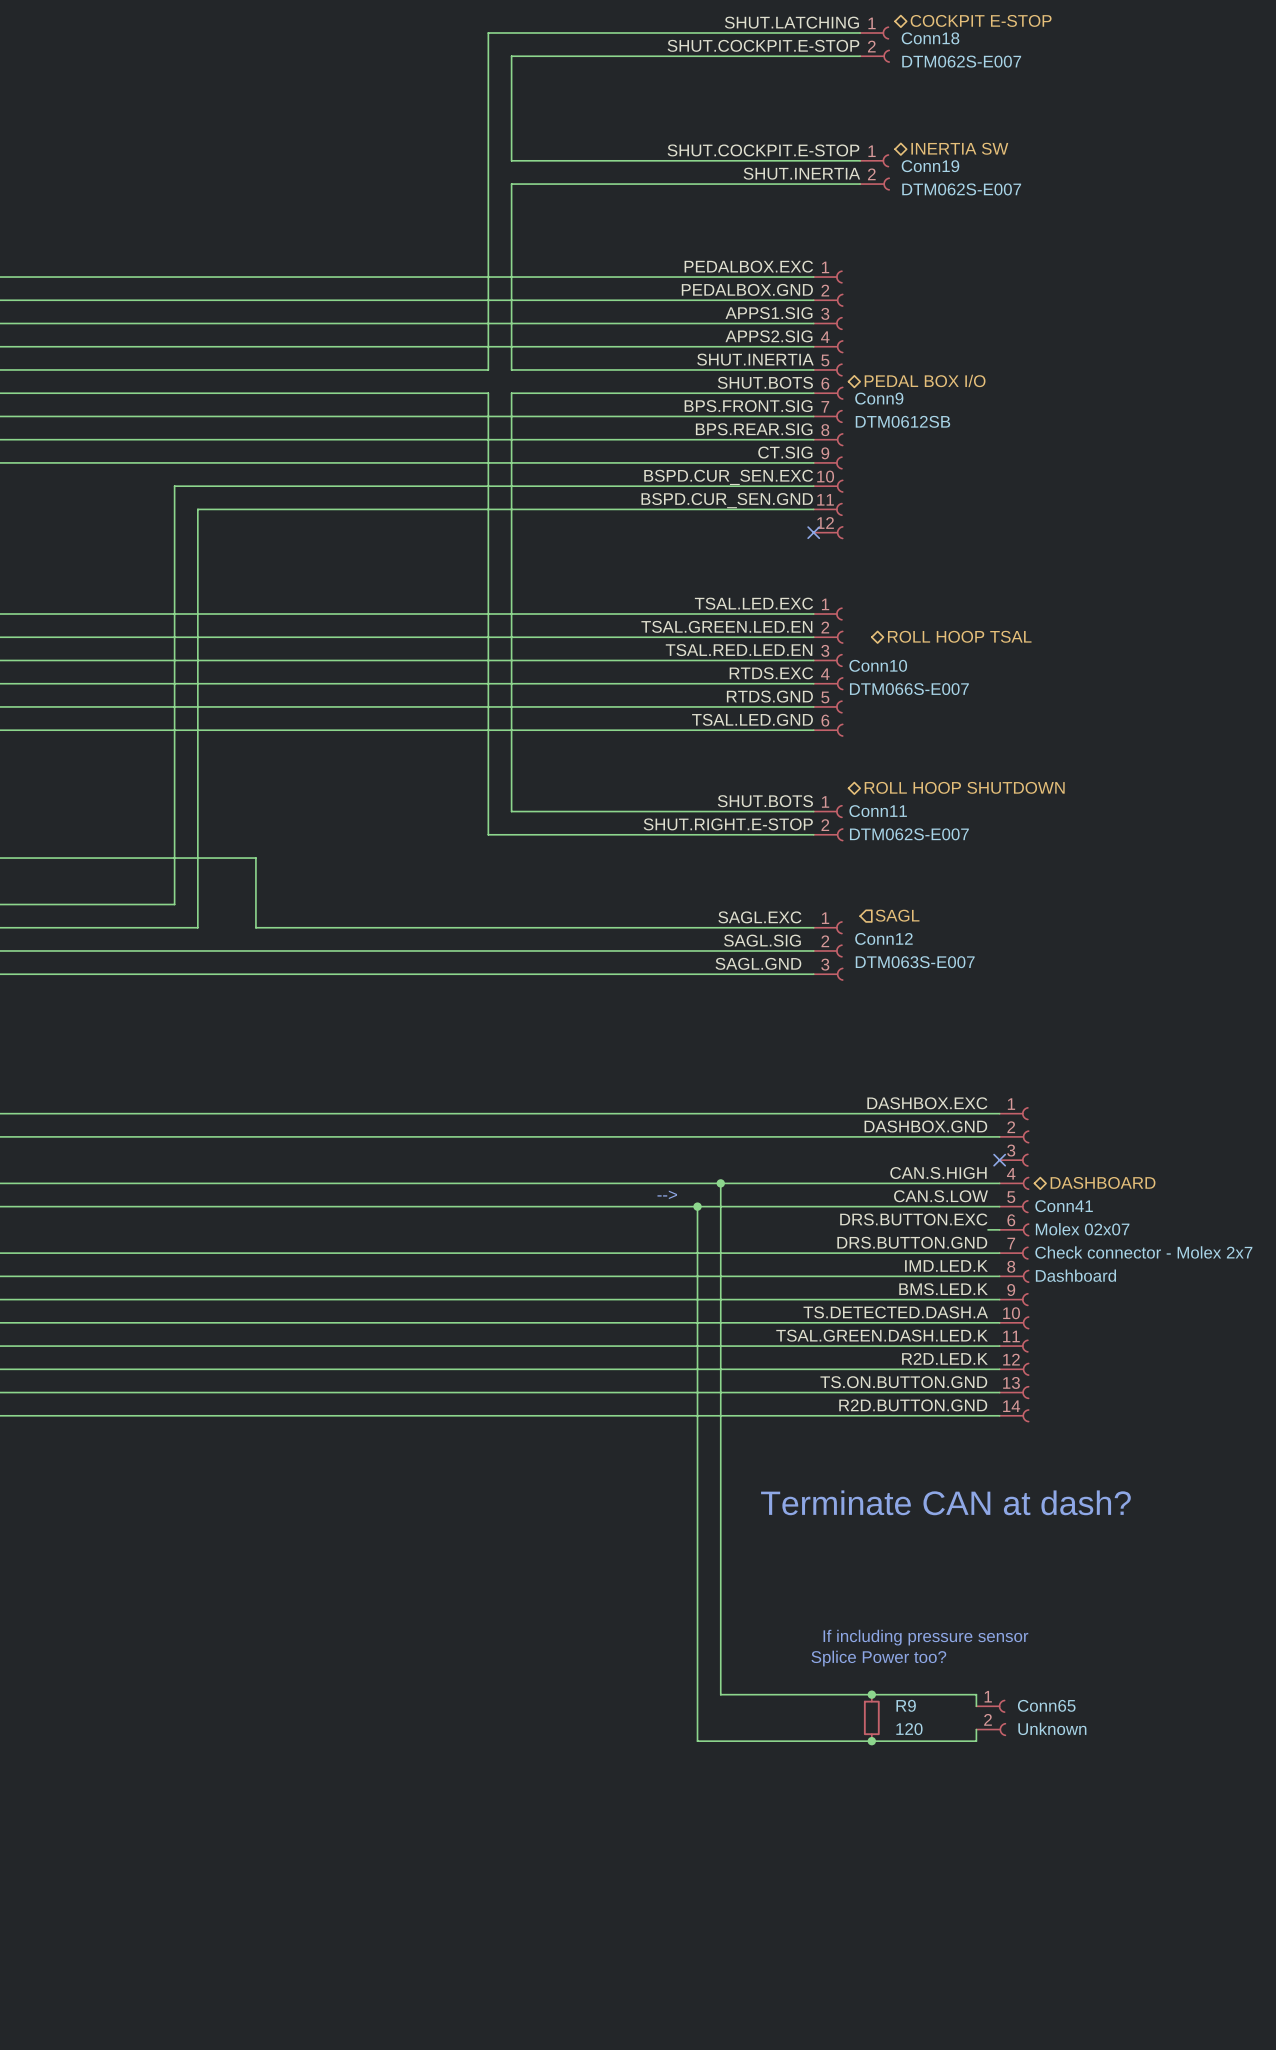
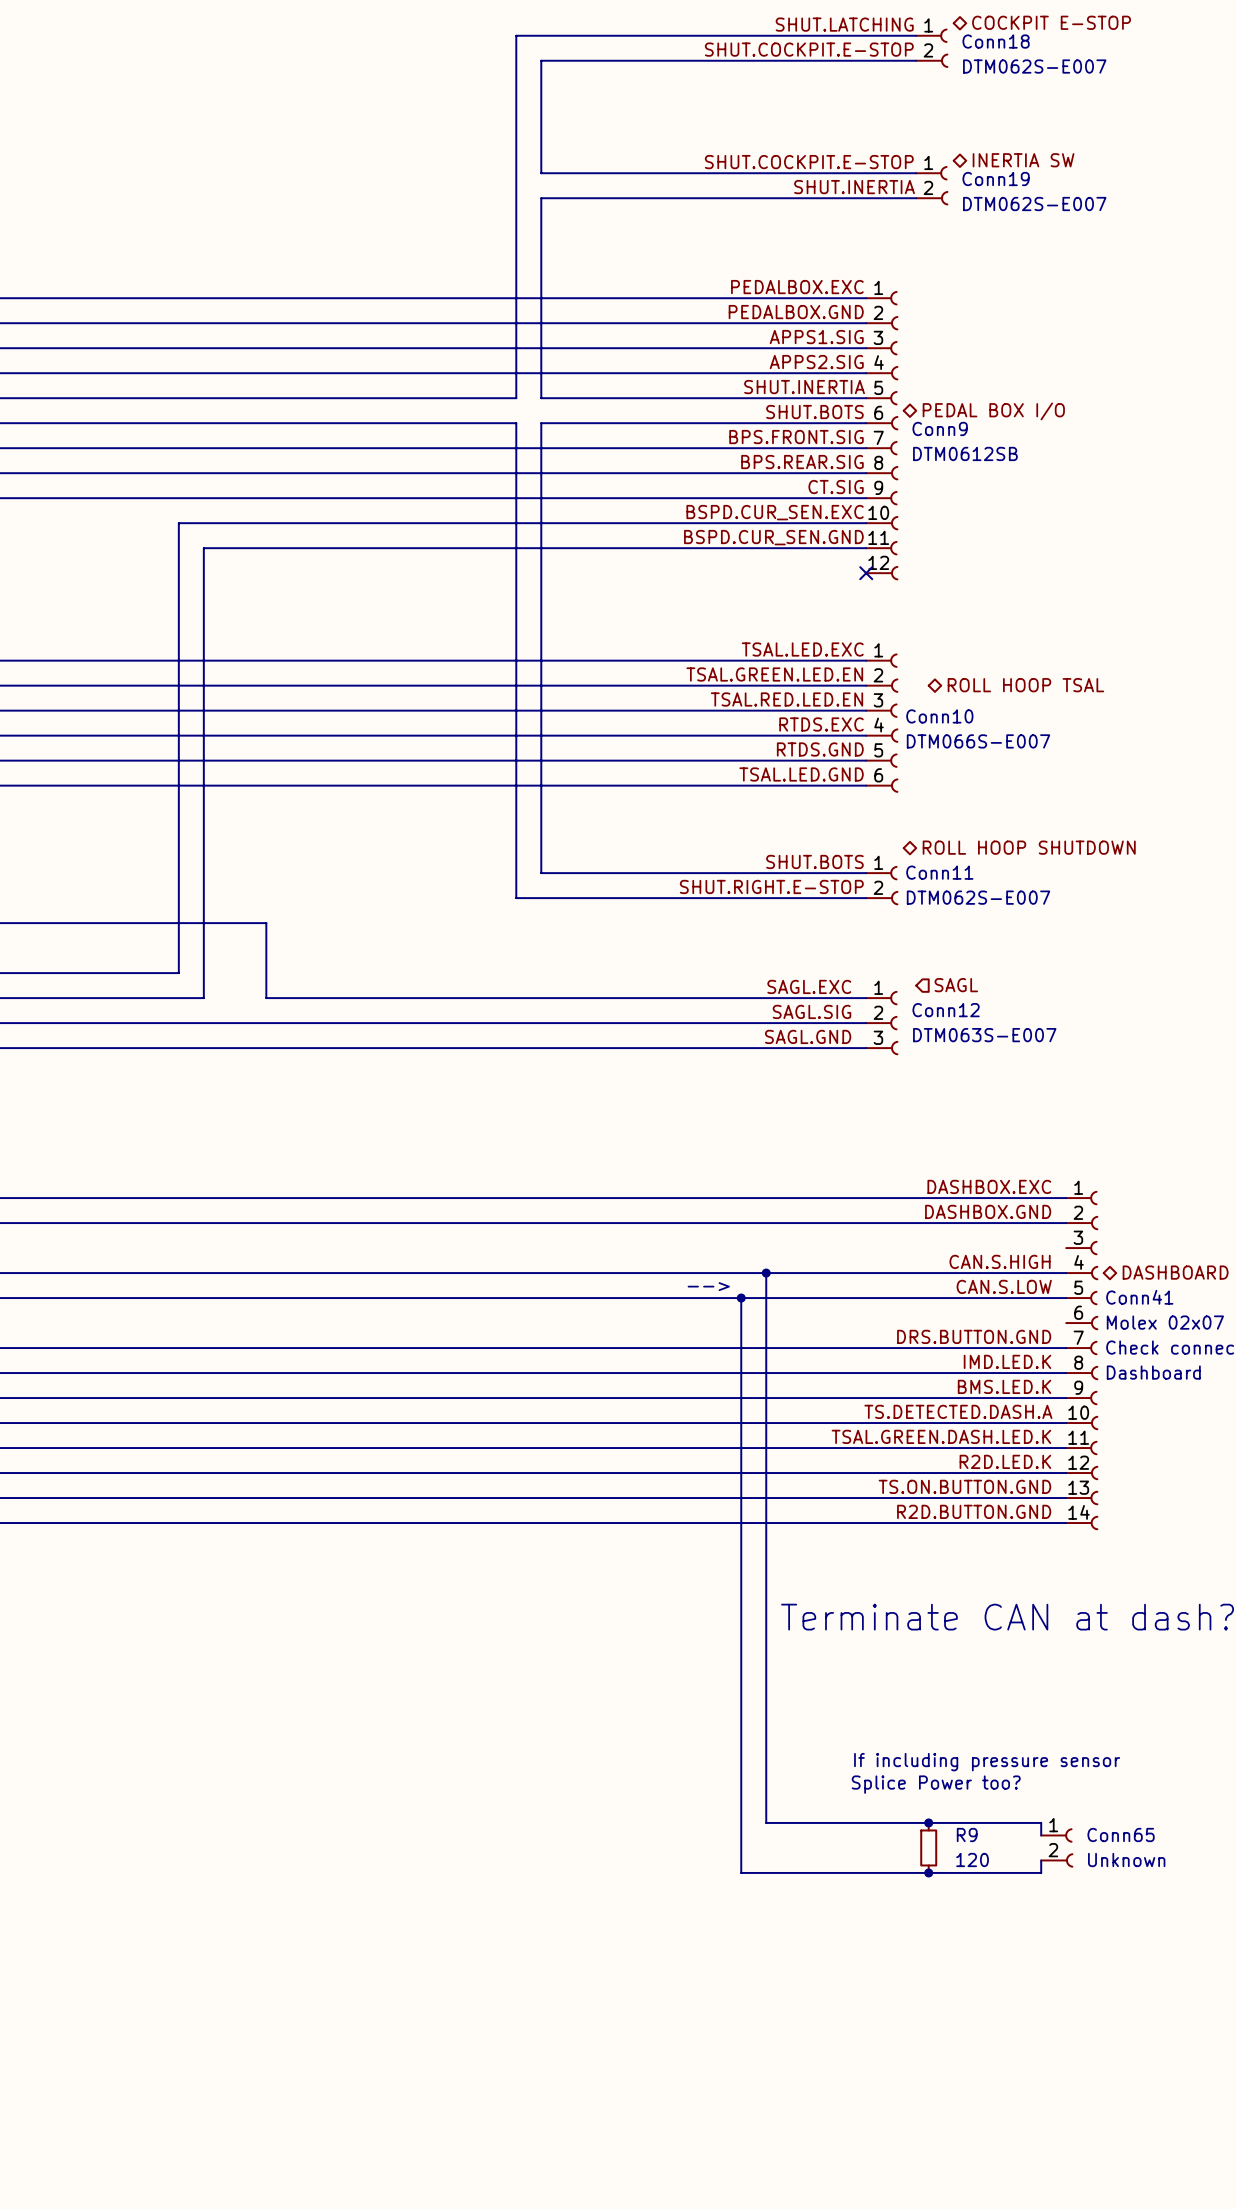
no-connect mark: (999, 1160) -> none
label: DRS.BUTTON.EXC (913, 1219) -> none
wire: (988, 1229) (999, 1229) -> none

